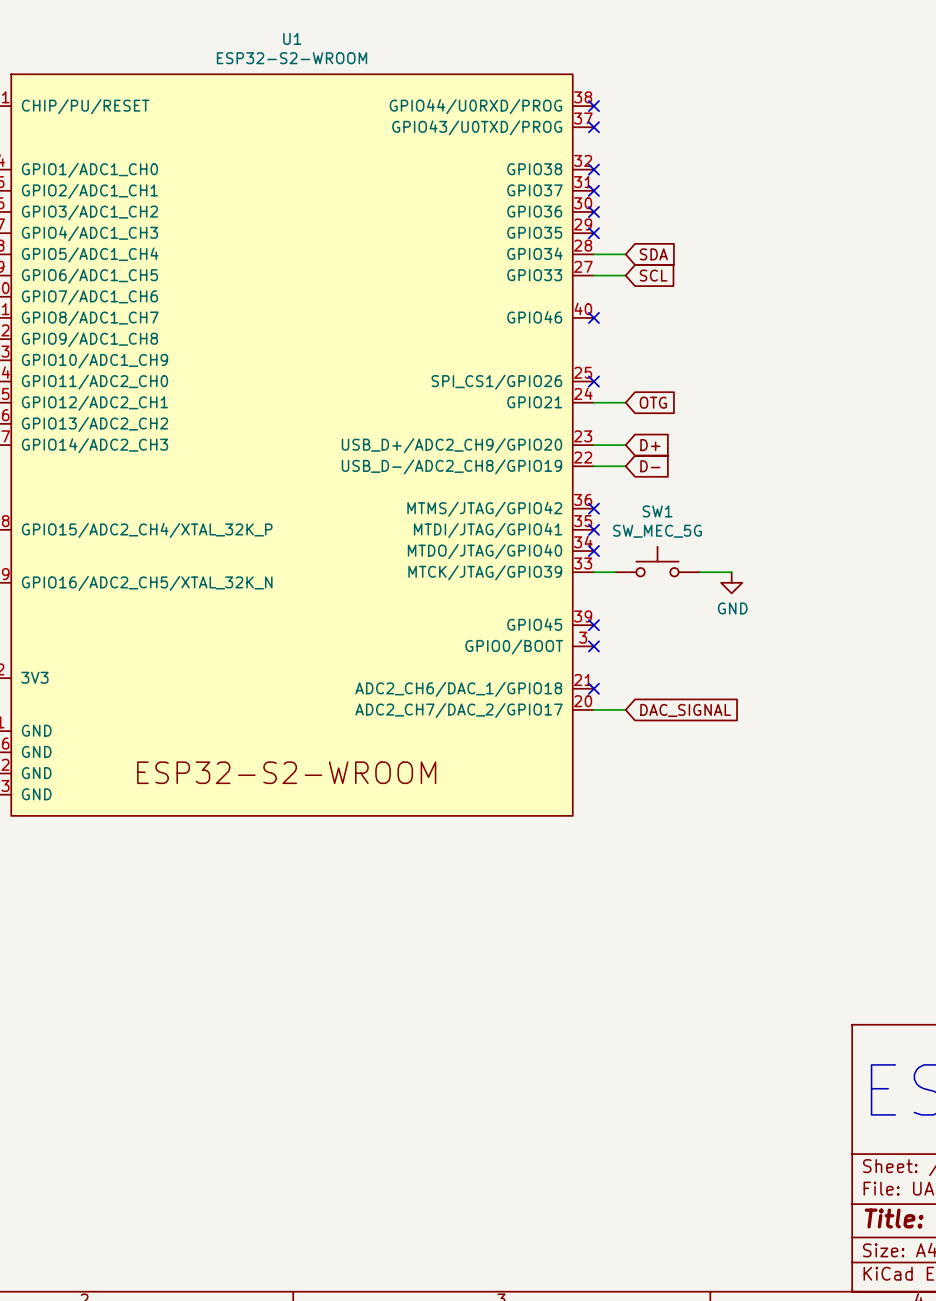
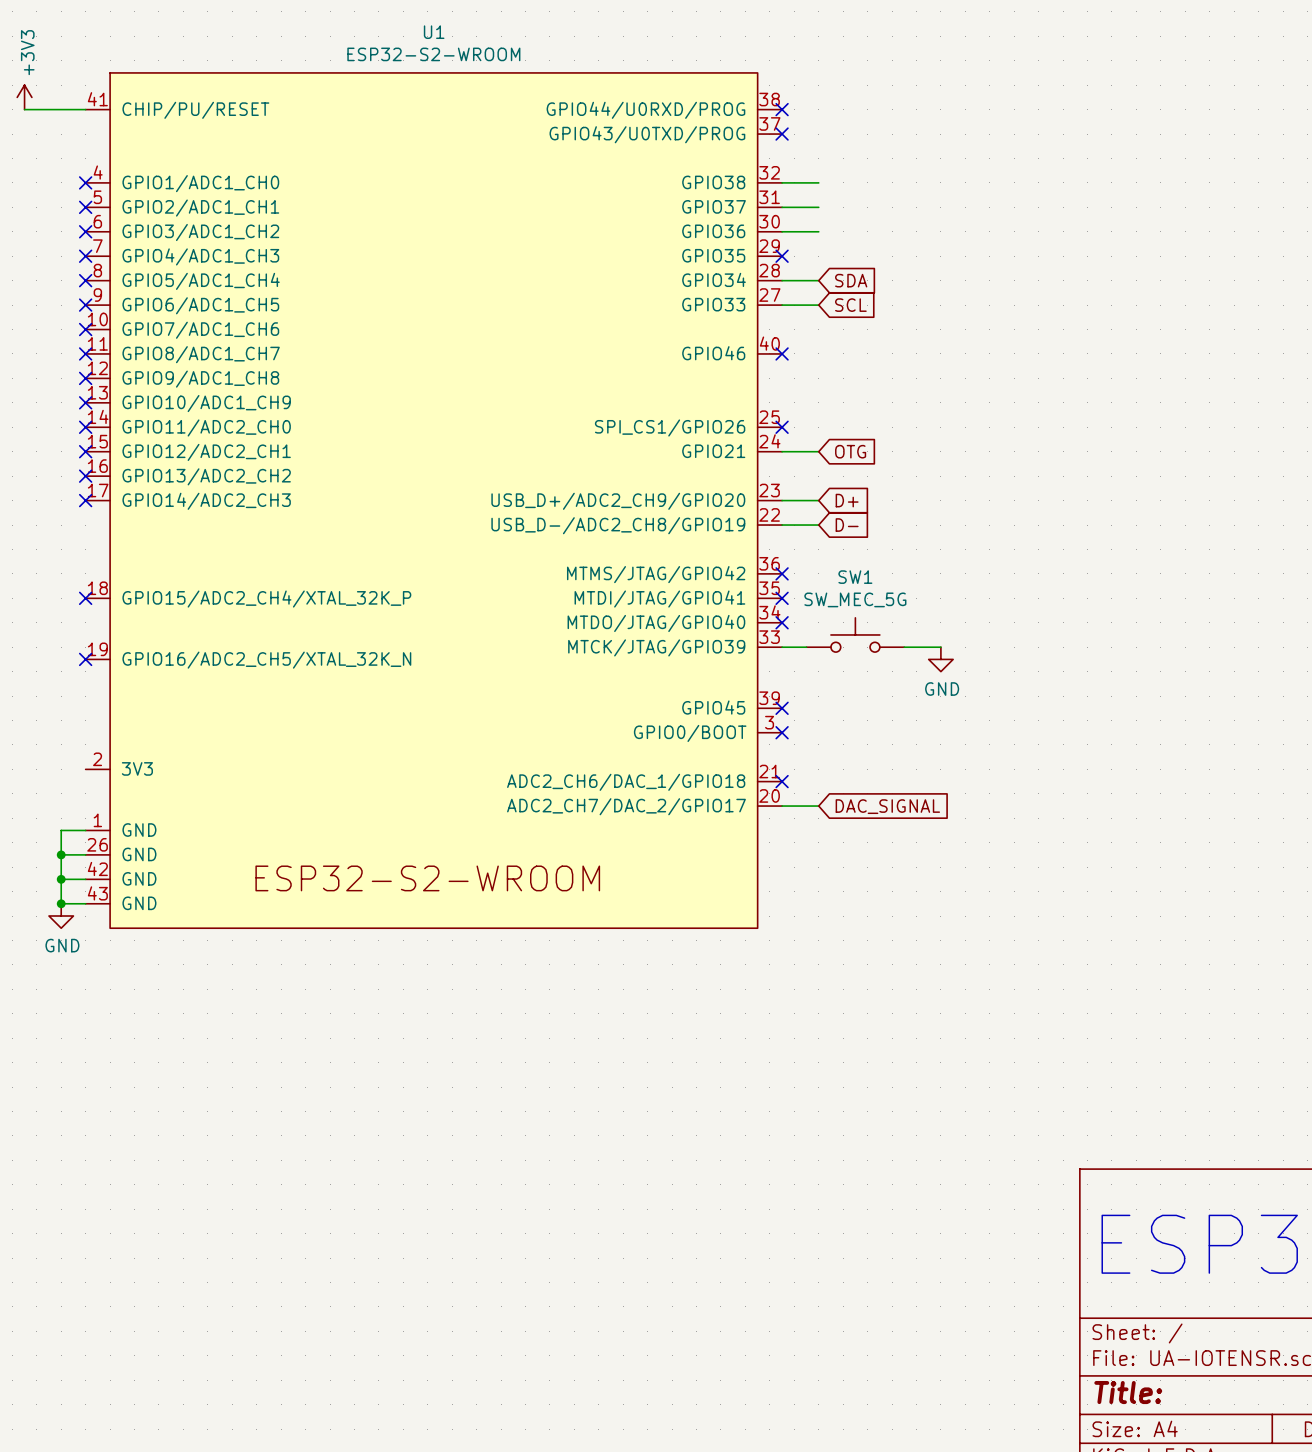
wire: none -> (782, 182) (818, 182)
no-connect mark: (593, 169) -> none
wire: none -> (782, 207) (818, 207)
no-connect mark: (593, 190) -> none
wire: none -> (782, 231) (818, 231)
no-connect mark: (593, 212) -> none

